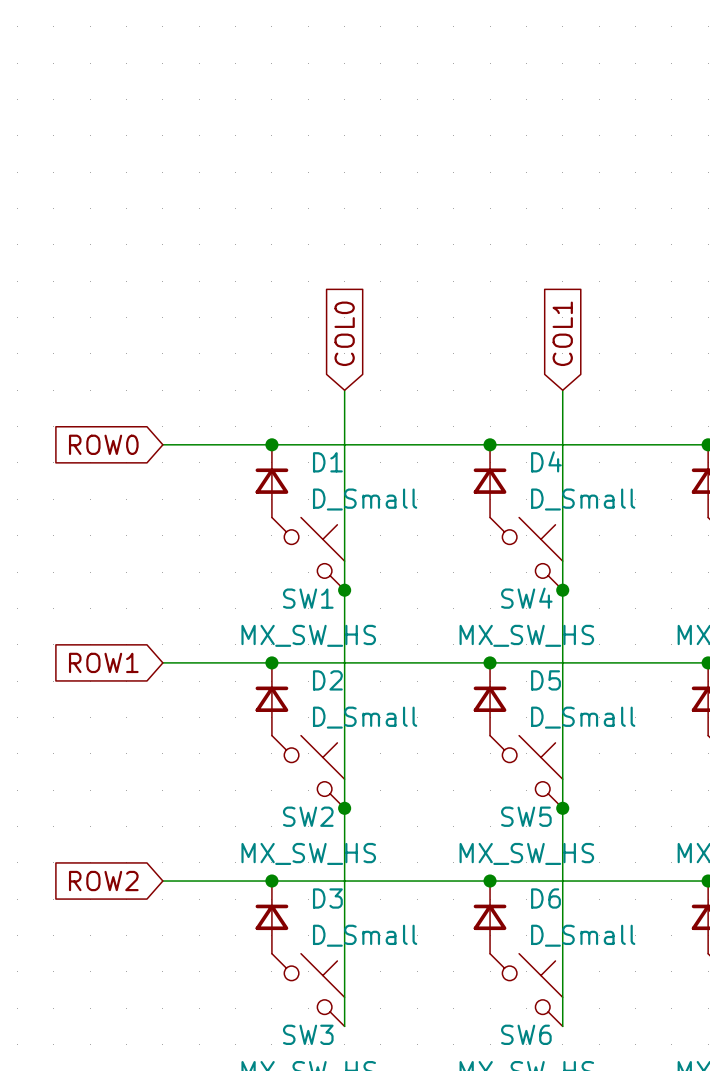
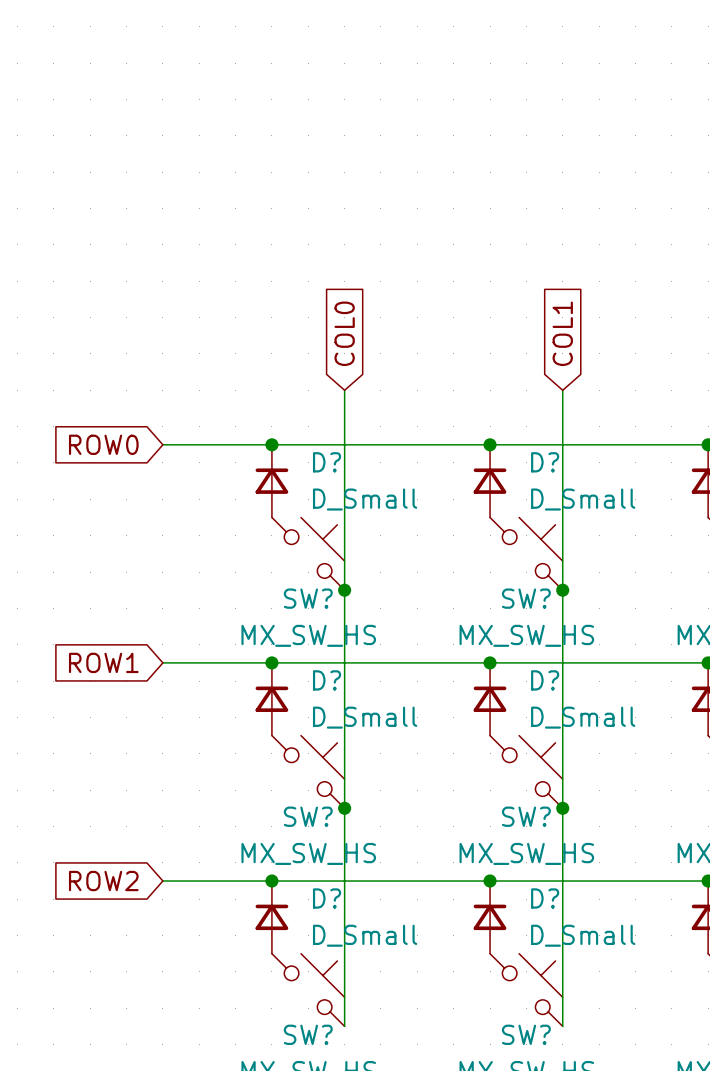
D4 name: D4 (546, 461) -> D? (545, 462)
D1 name: D1 (327, 462) -> D? (327, 462)
SW1 name: SW1 (308, 598) -> SW? (308, 598)
SW4 name: SW4 (526, 598) -> SW? (526, 598)
D2 name: D2 (327, 680) -> D? (327, 680)
D5 name: D5 (545, 680) -> D? (545, 680)
SW2 name: SW2 (308, 816) -> SW? (308, 816)
SW5 name: SW5 (526, 816) -> SW? (526, 816)
D3 name: D3 (327, 898) -> D? (327, 898)
D6 name: D6 (545, 898) -> D? (545, 898)
SW3 name: SW3 (308, 1034) -> SW? (308, 1034)
SW6 name: SW6 (526, 1034) -> SW? (526, 1034)

